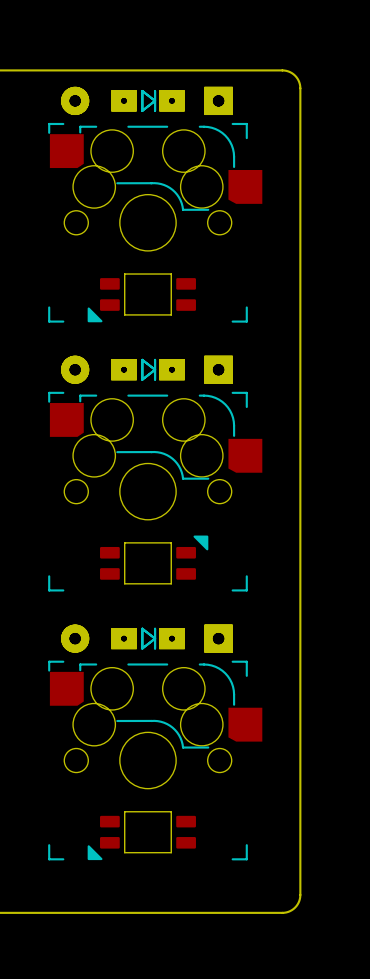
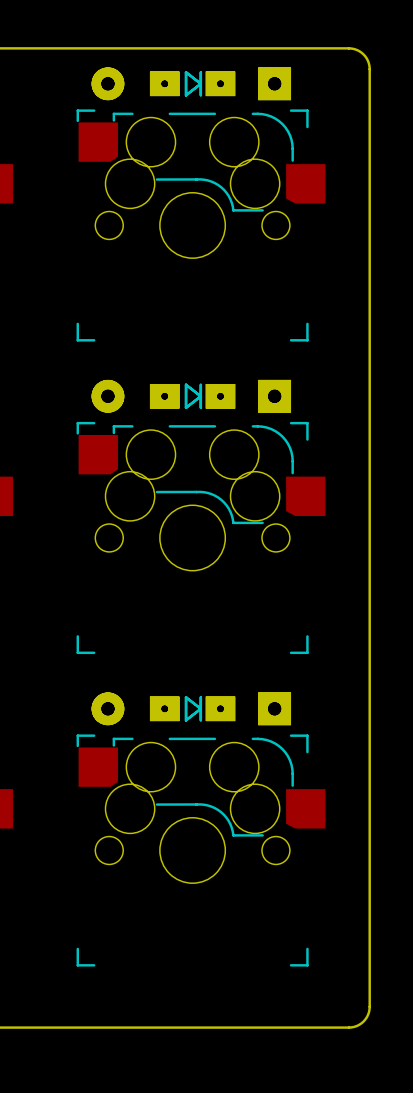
part: (141, 297) -> none
part: (154, 560) -> none
part: (141, 835) -> none

